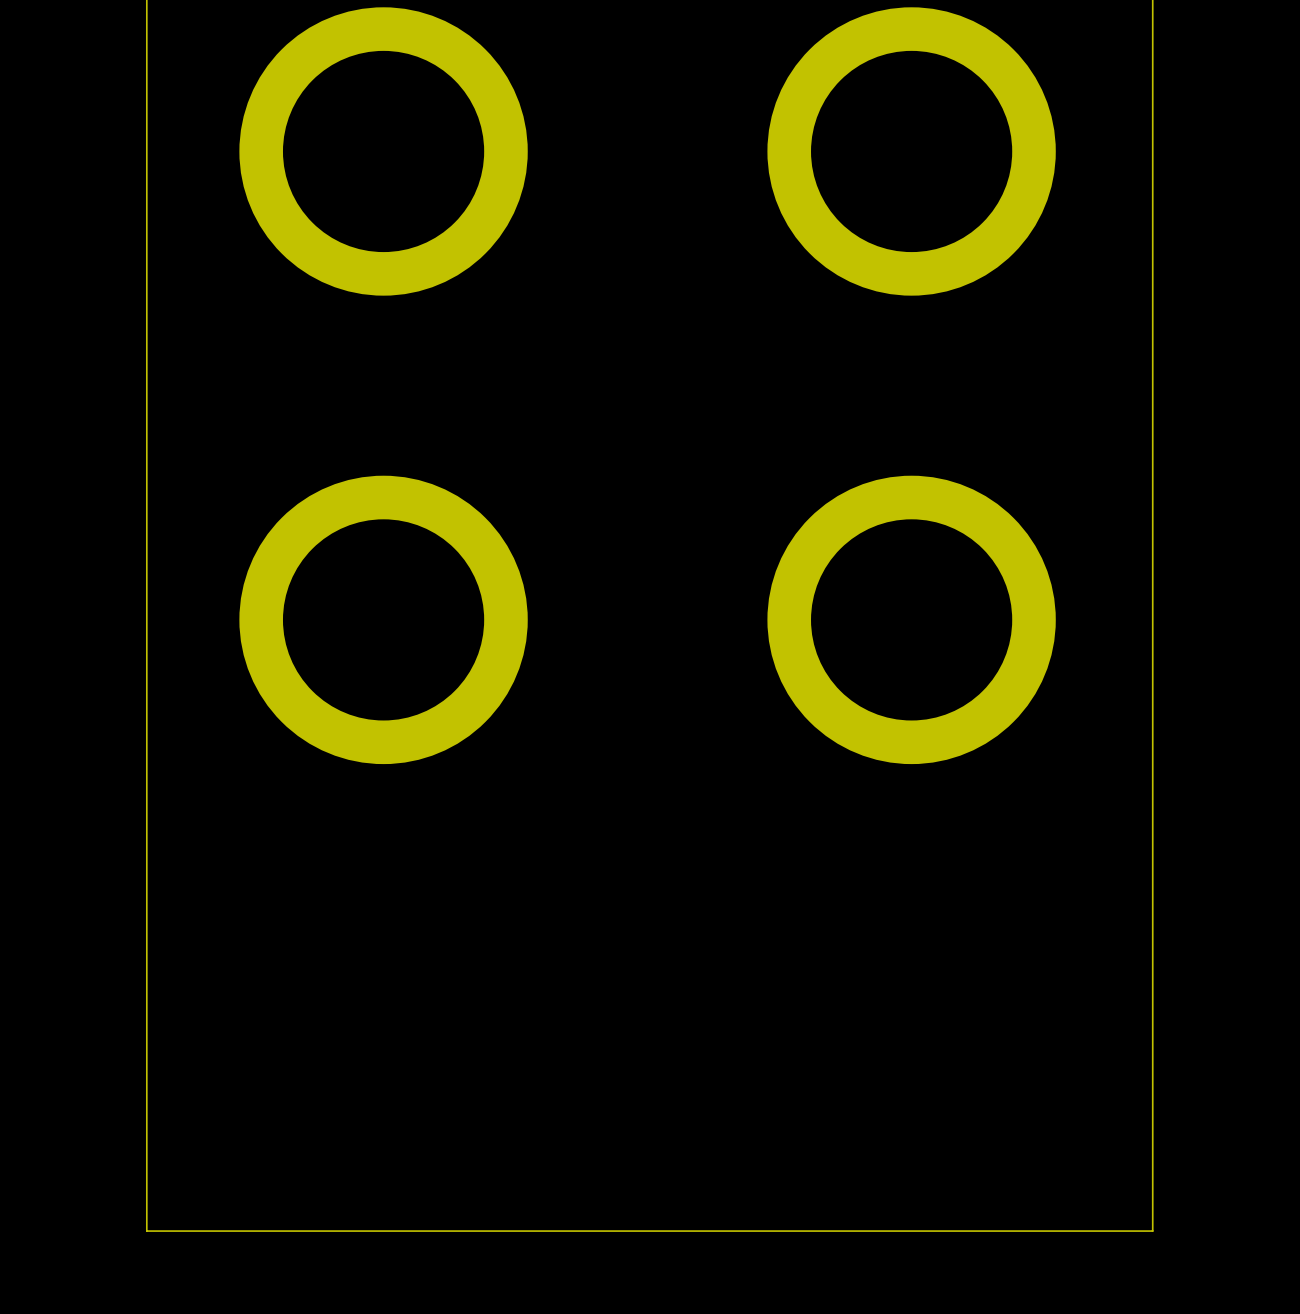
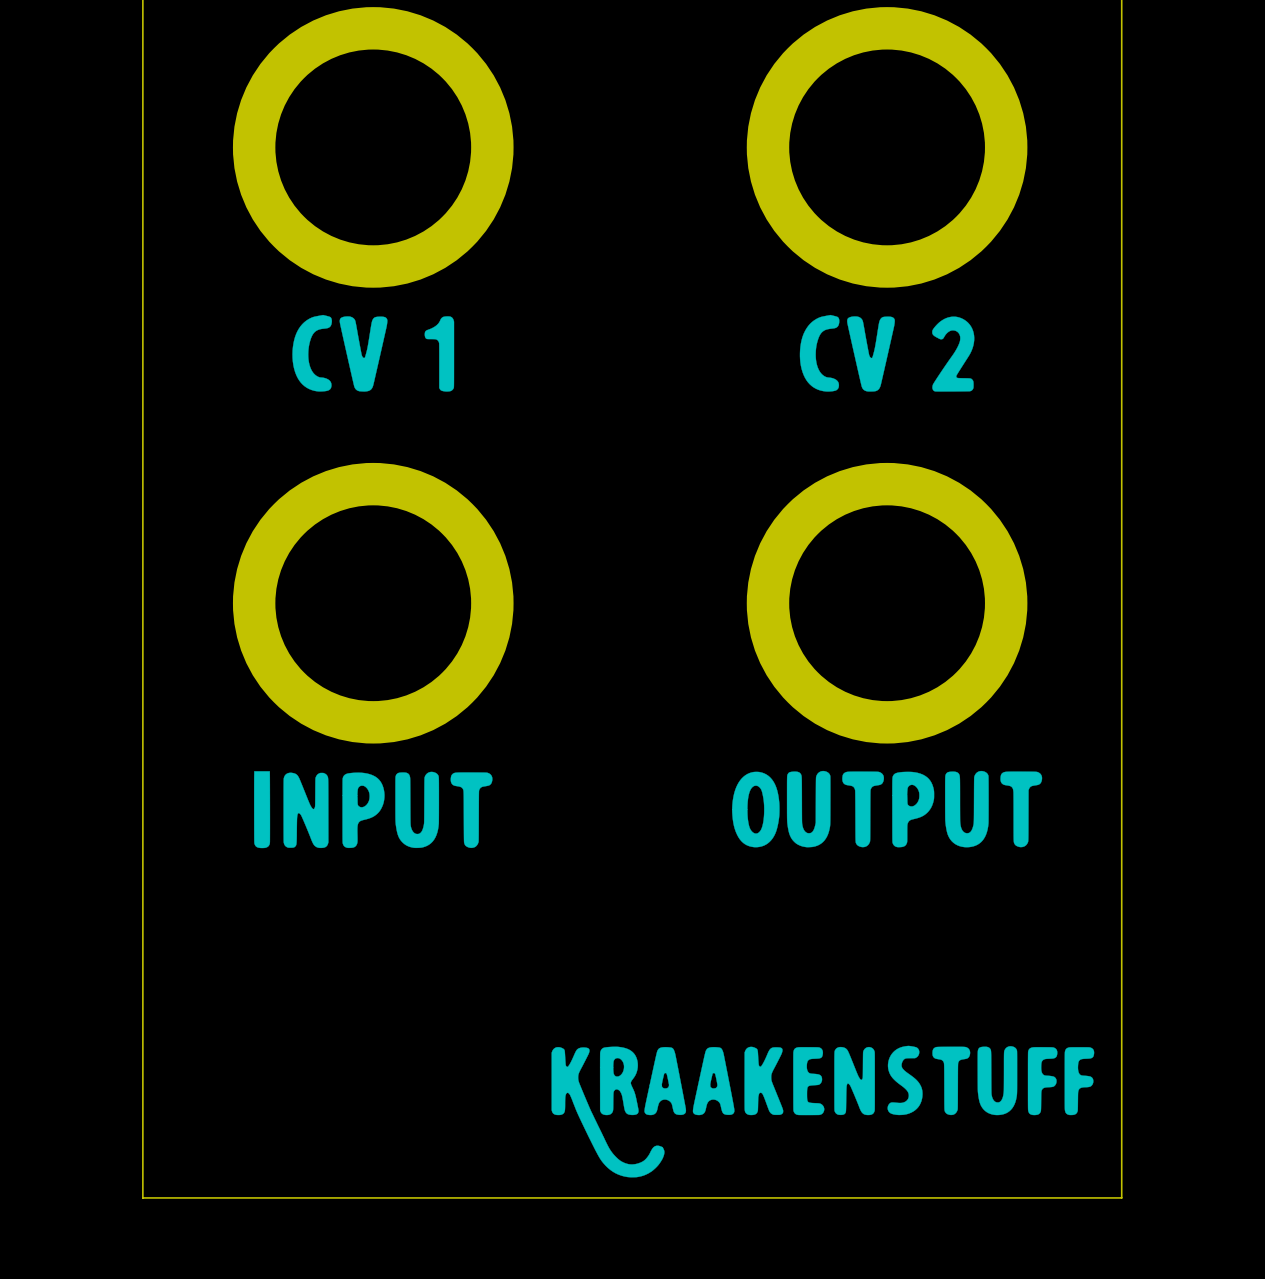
drawing: none -> [292, 314, 455, 392]
drawing: none -> [799, 314, 975, 392]
drawing: none -> [254, 771, 493, 849]
drawing: none -> [732, 770, 1043, 848]
drawing: none -> [551, 1045, 1095, 1178]

